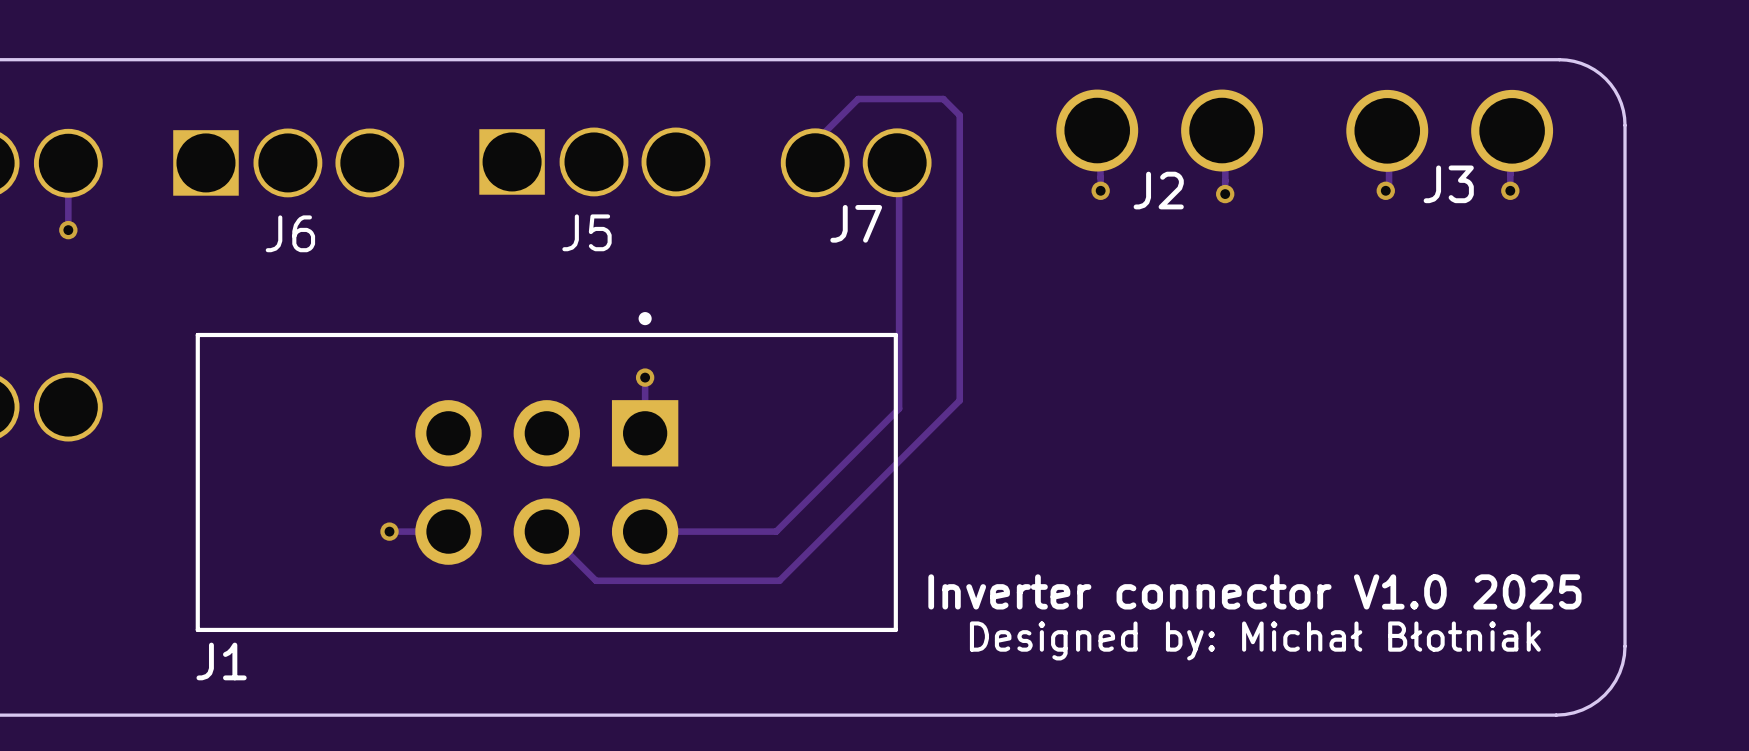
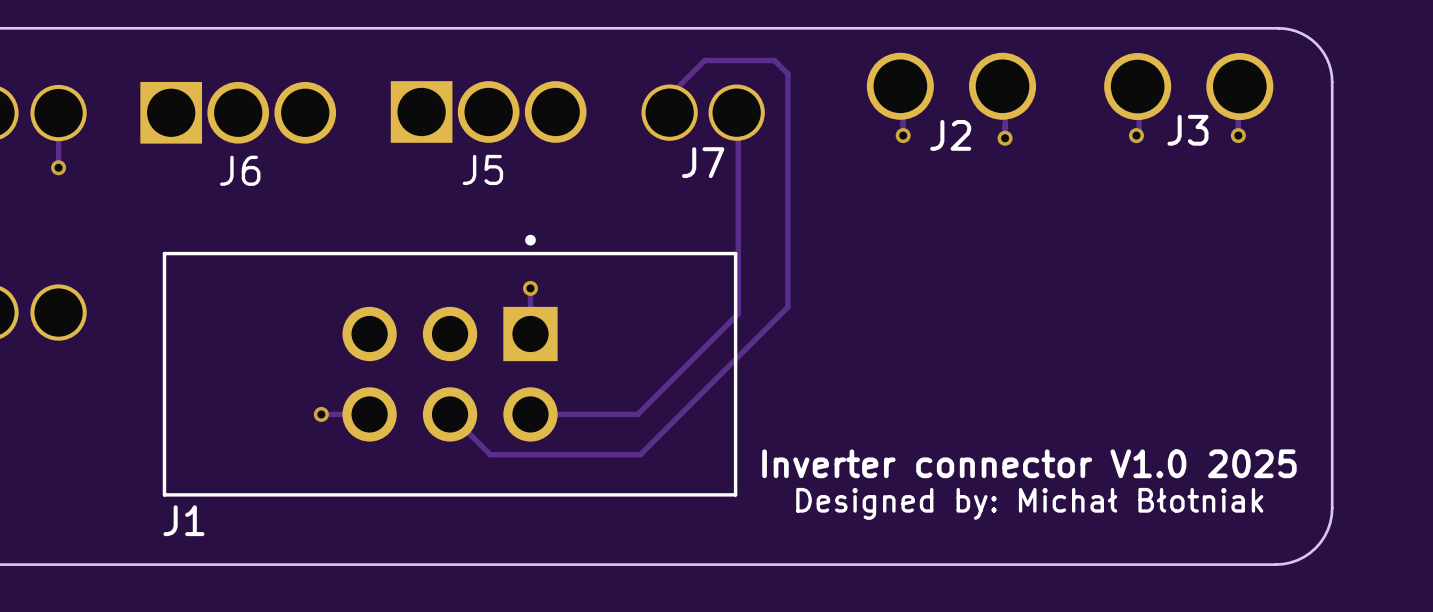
J5 footprint: [479, 127, 711, 197] -> [390, 81, 587, 143]
J6 footprint: [173, 128, 405, 198] -> [140, 81, 337, 144]

